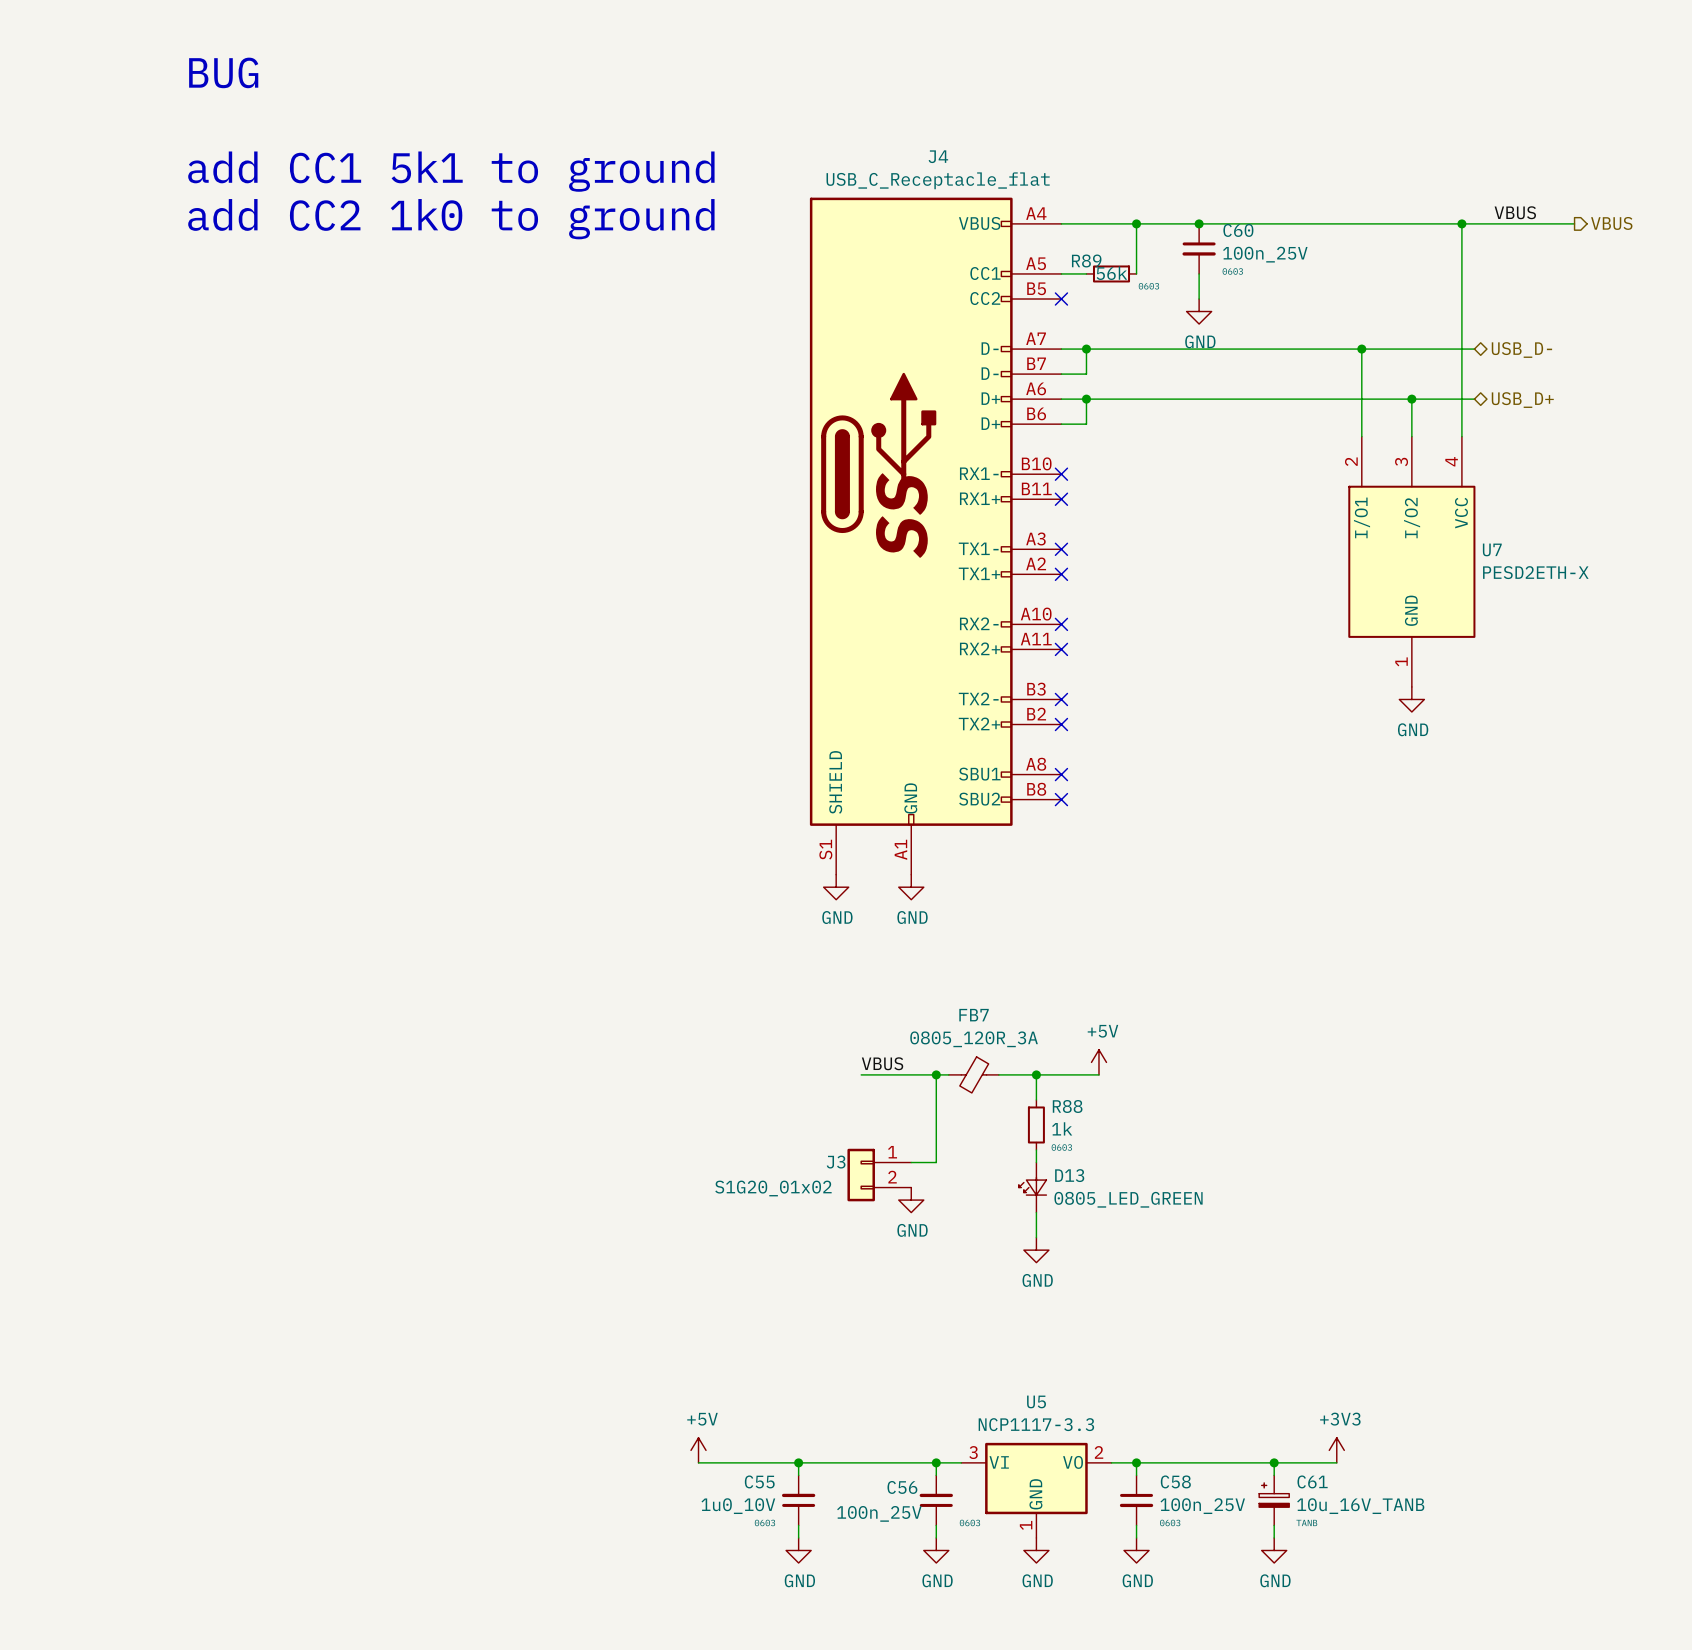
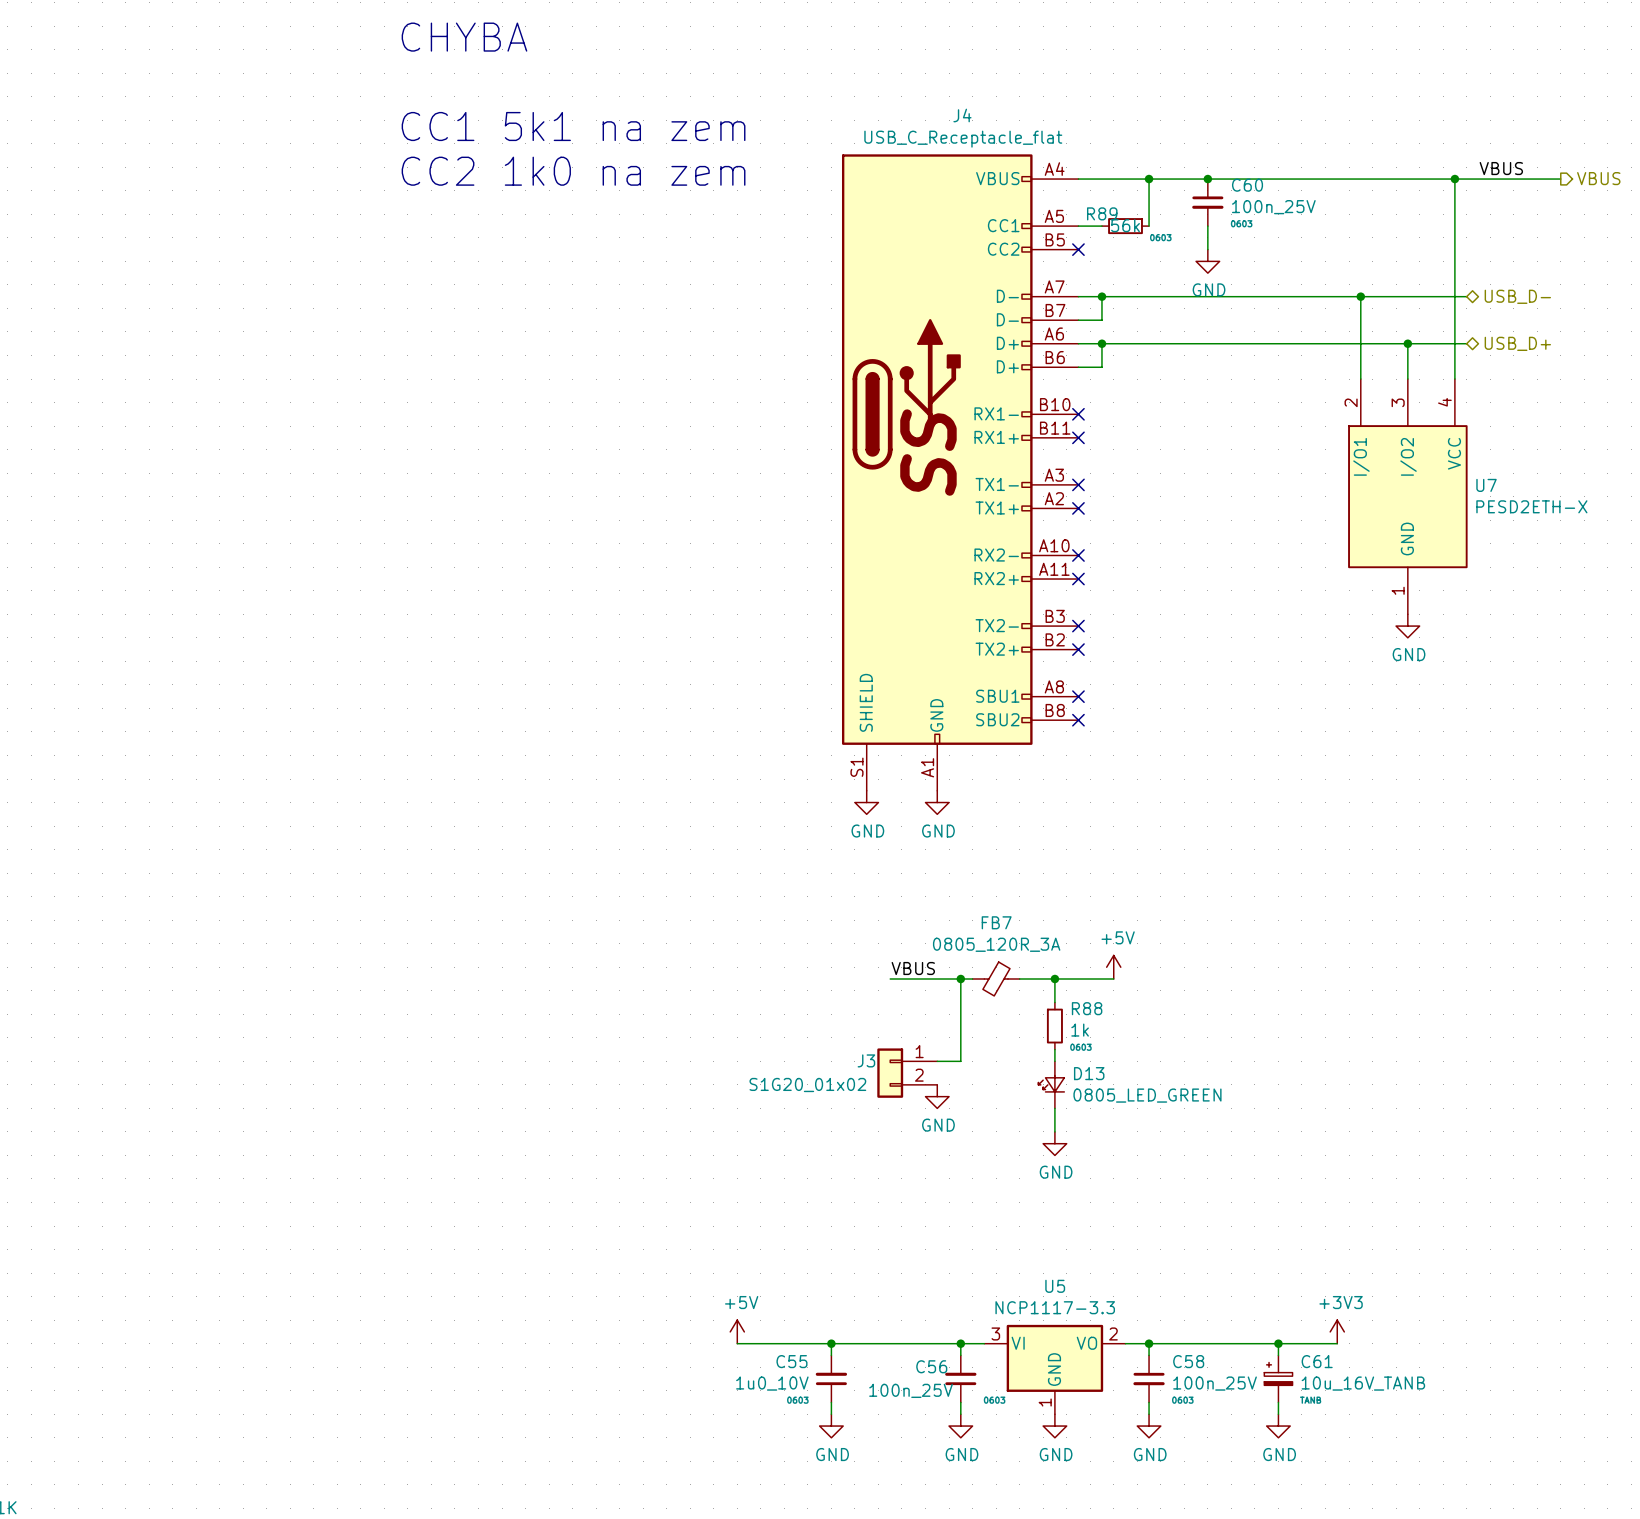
text: BUG (223, 72) -> none
text: none -> CHYBA (464, 37)
text: none -> CC1 5k1 na zem (573, 126)
text: add CC1 5k1 to ground (451, 171) -> none
text: none -> CC2 1k0 na zem (573, 171)
text: add CC2 1k0 to ground (451, 219) -> none

